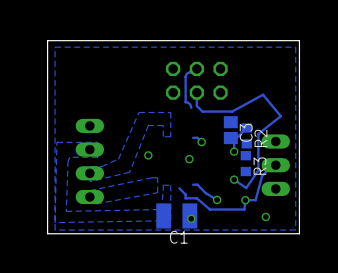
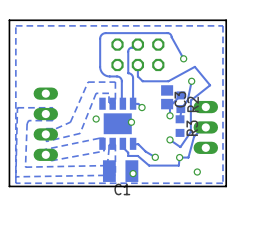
track: none -> (183, 58) (168, 33) (102, 34) (100, 38) (100, 69) (106, 75) (118, 76) (121, 78) (122, 103)
via: none -> (183, 58)
track: none -> (133, 78) (133, 103) (134, 103)
track: none -> (191, 81) (187, 100) (180, 109) (180, 119)
via: none -> (191, 81)
part: none -> (117, 123)

